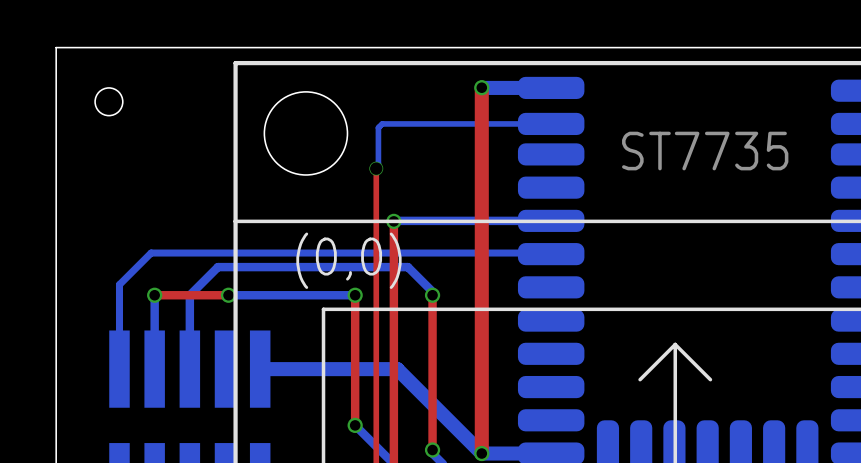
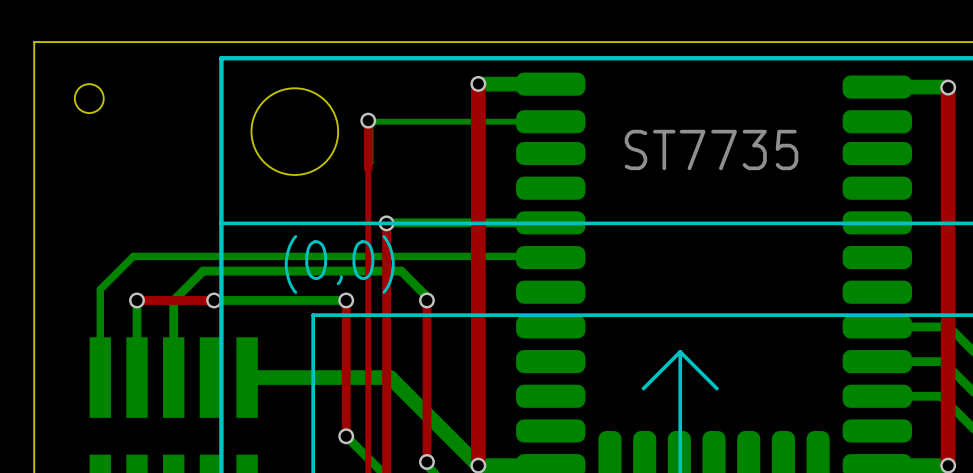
top track: none -> (368, 120) (368, 168)
via: none -> (368, 120)
via: (376, 168) -> none

